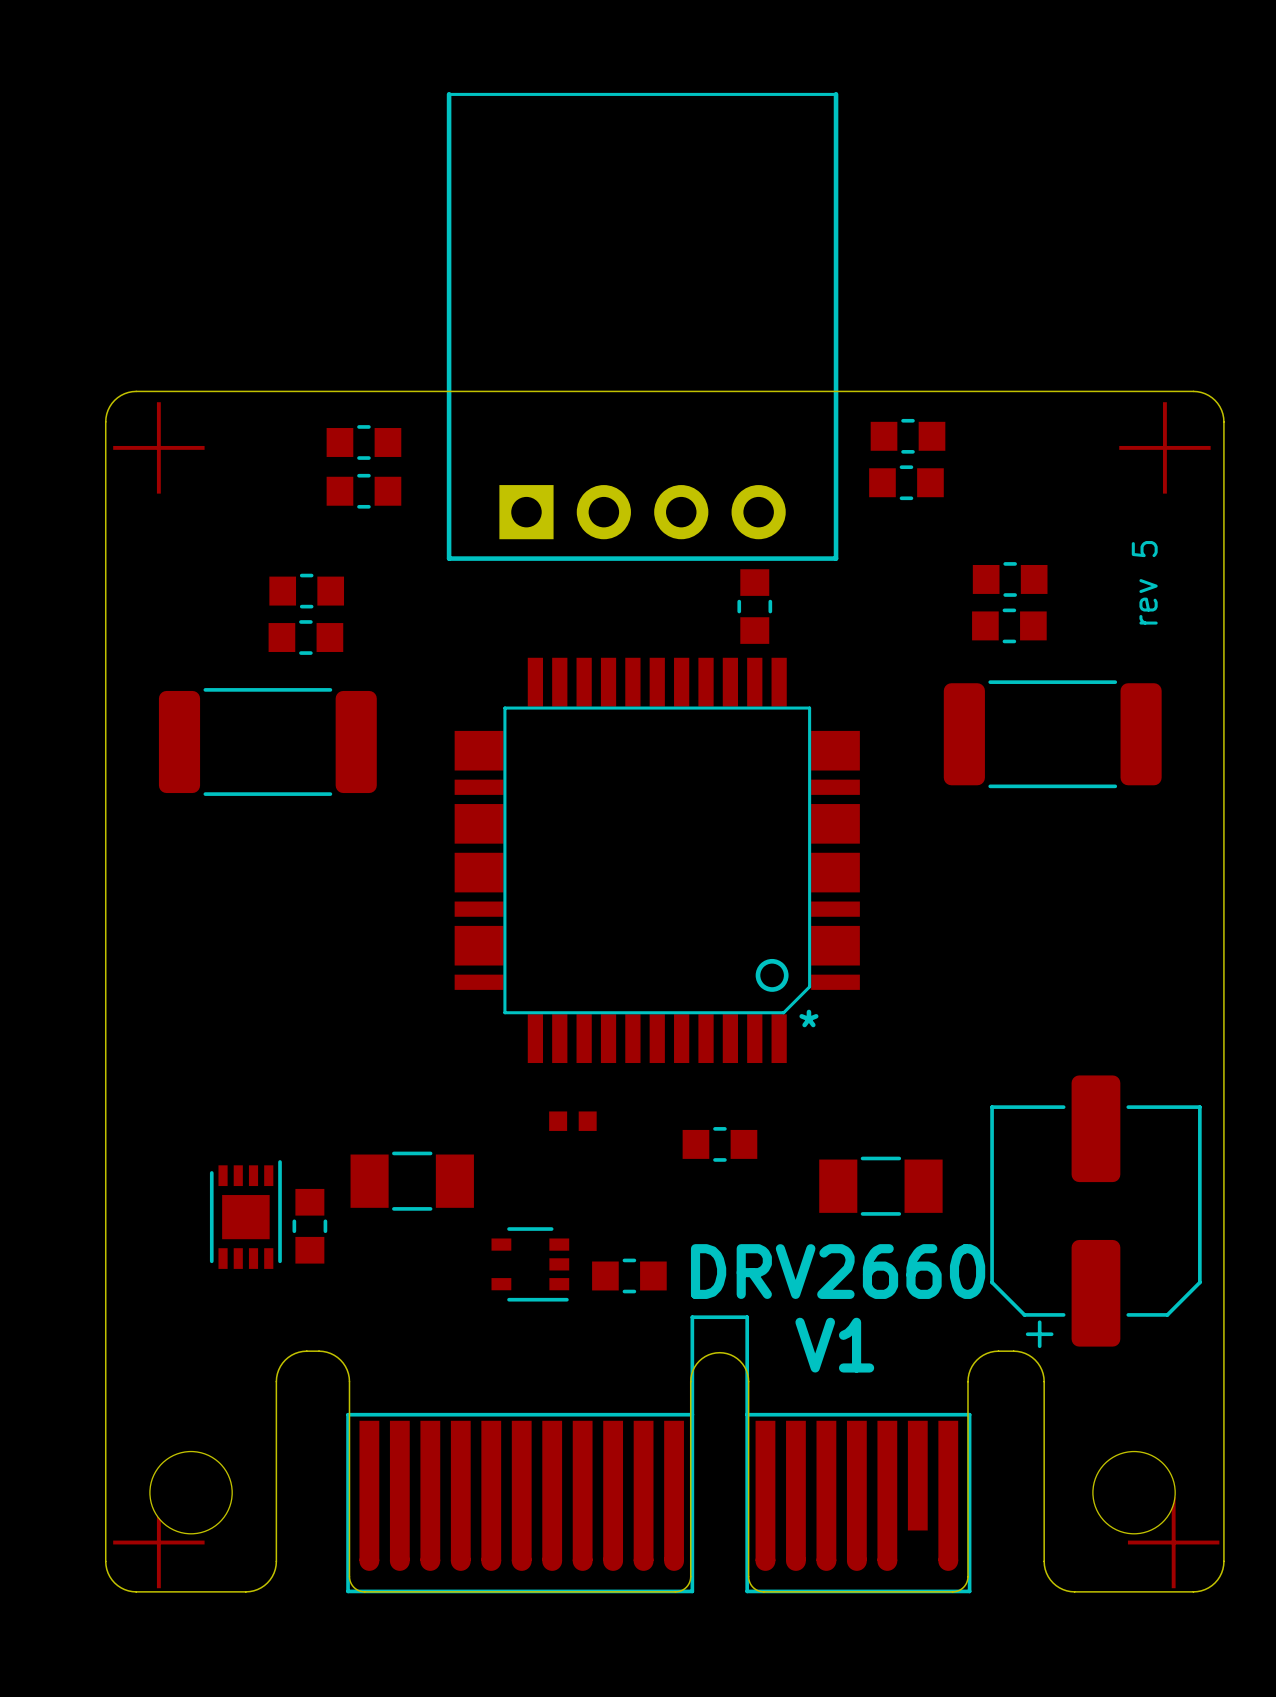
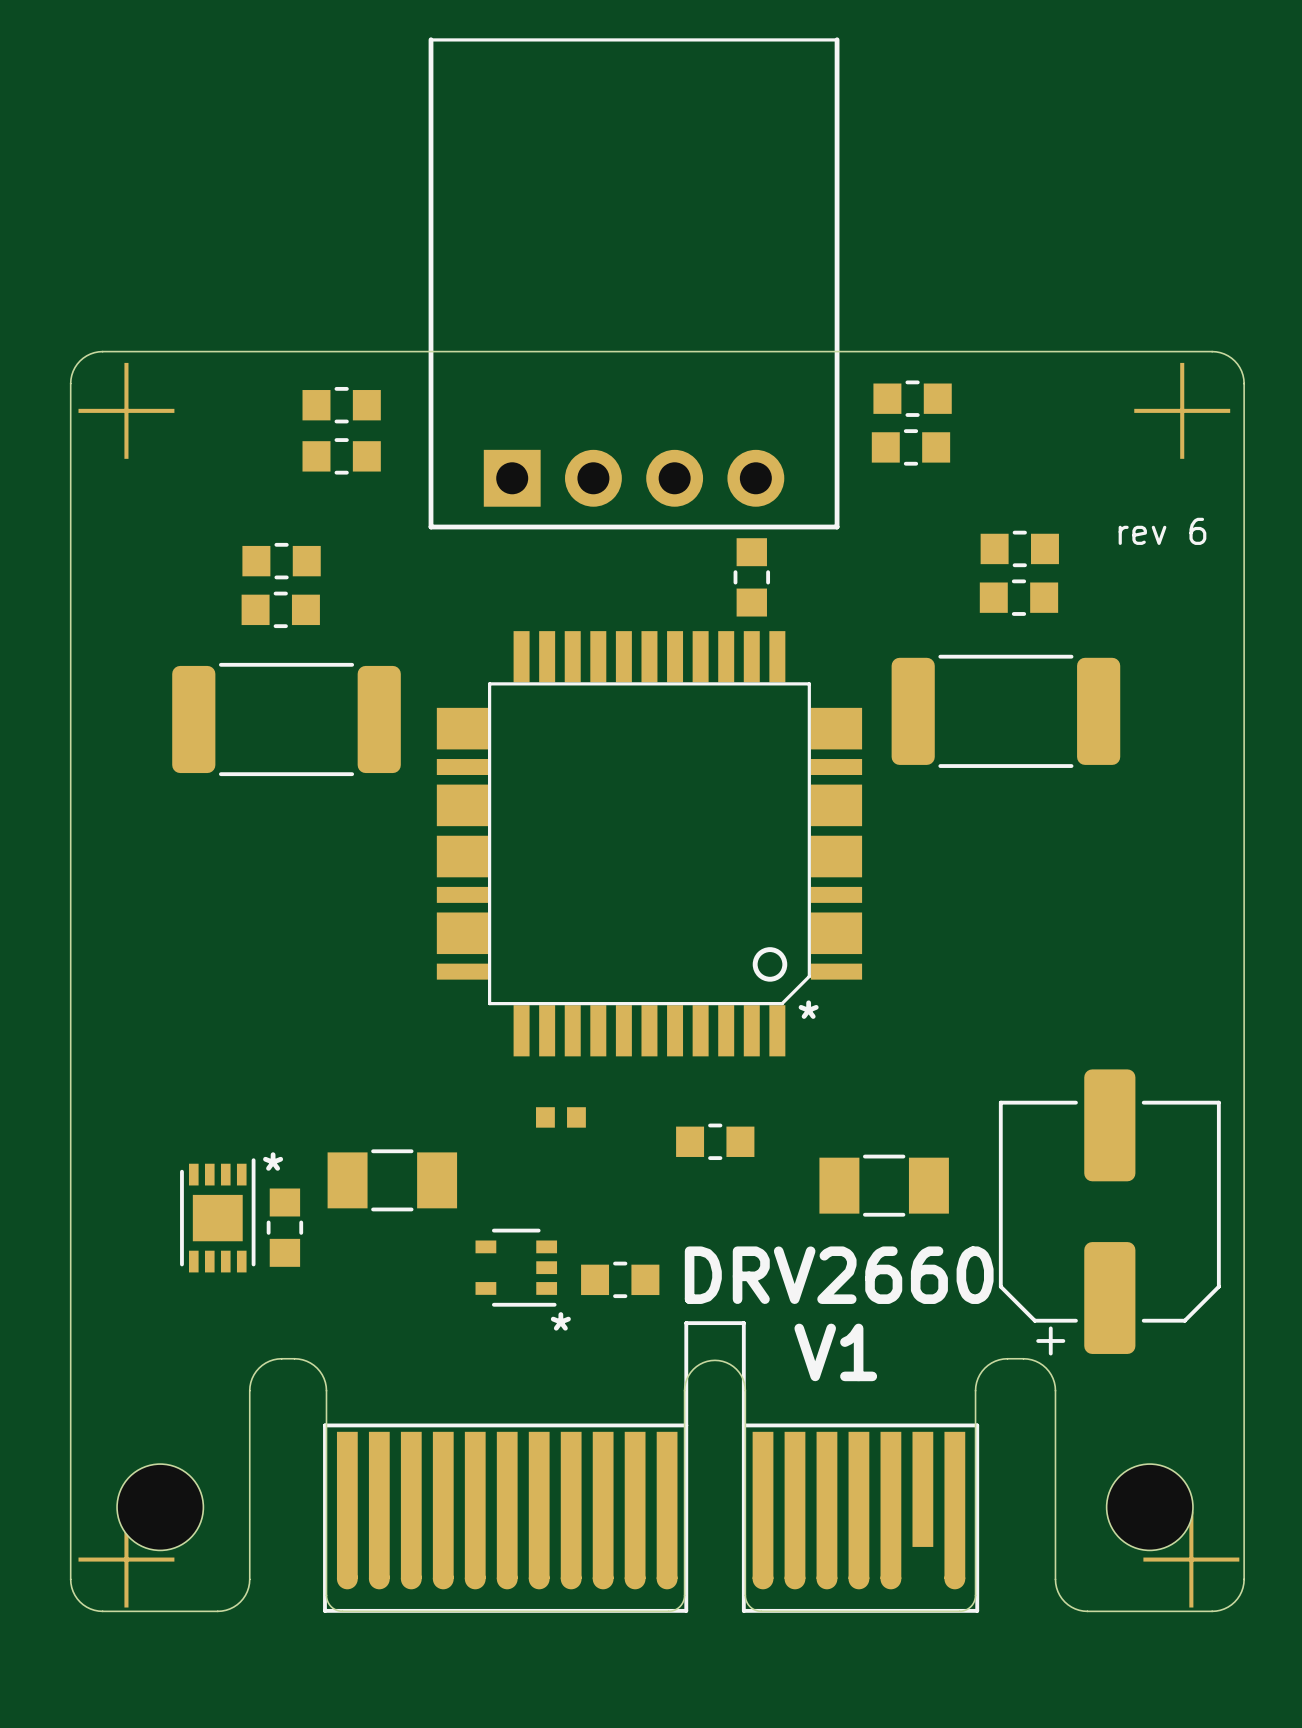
text: rev 5 (1144, 582) -> rev 6 (1162, 531)
part position: (1052, 734) -> (1005, 711)
part position: (267, 741) -> (286, 719)
text: none -> * (273, 1161)
text: none -> * (560, 1321)

